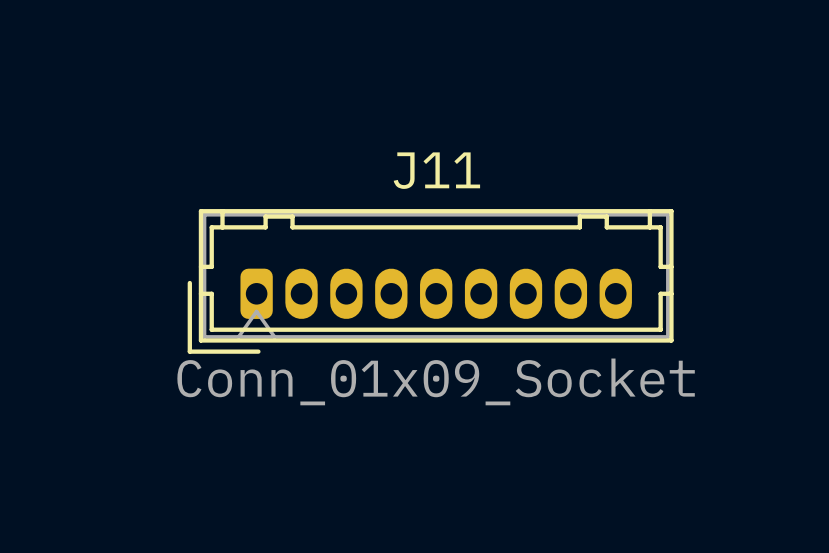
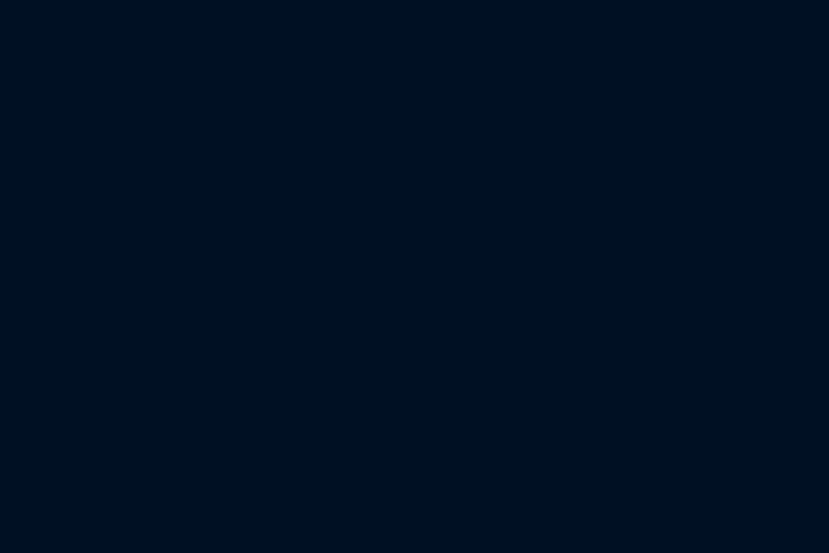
J11: Conn_01x09_Socket (430, 281) -> none

